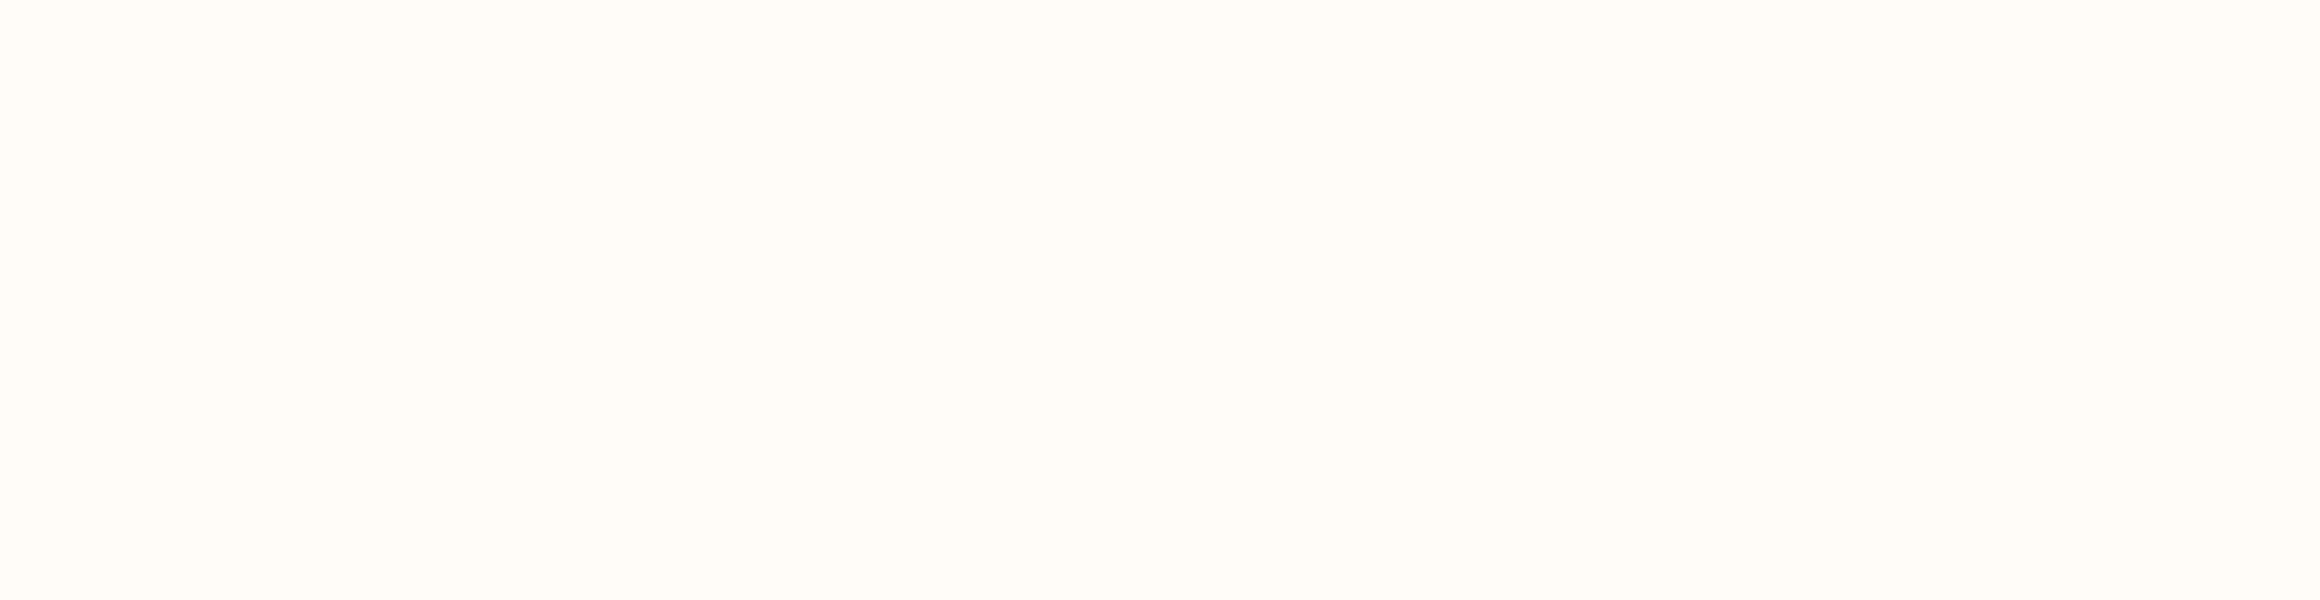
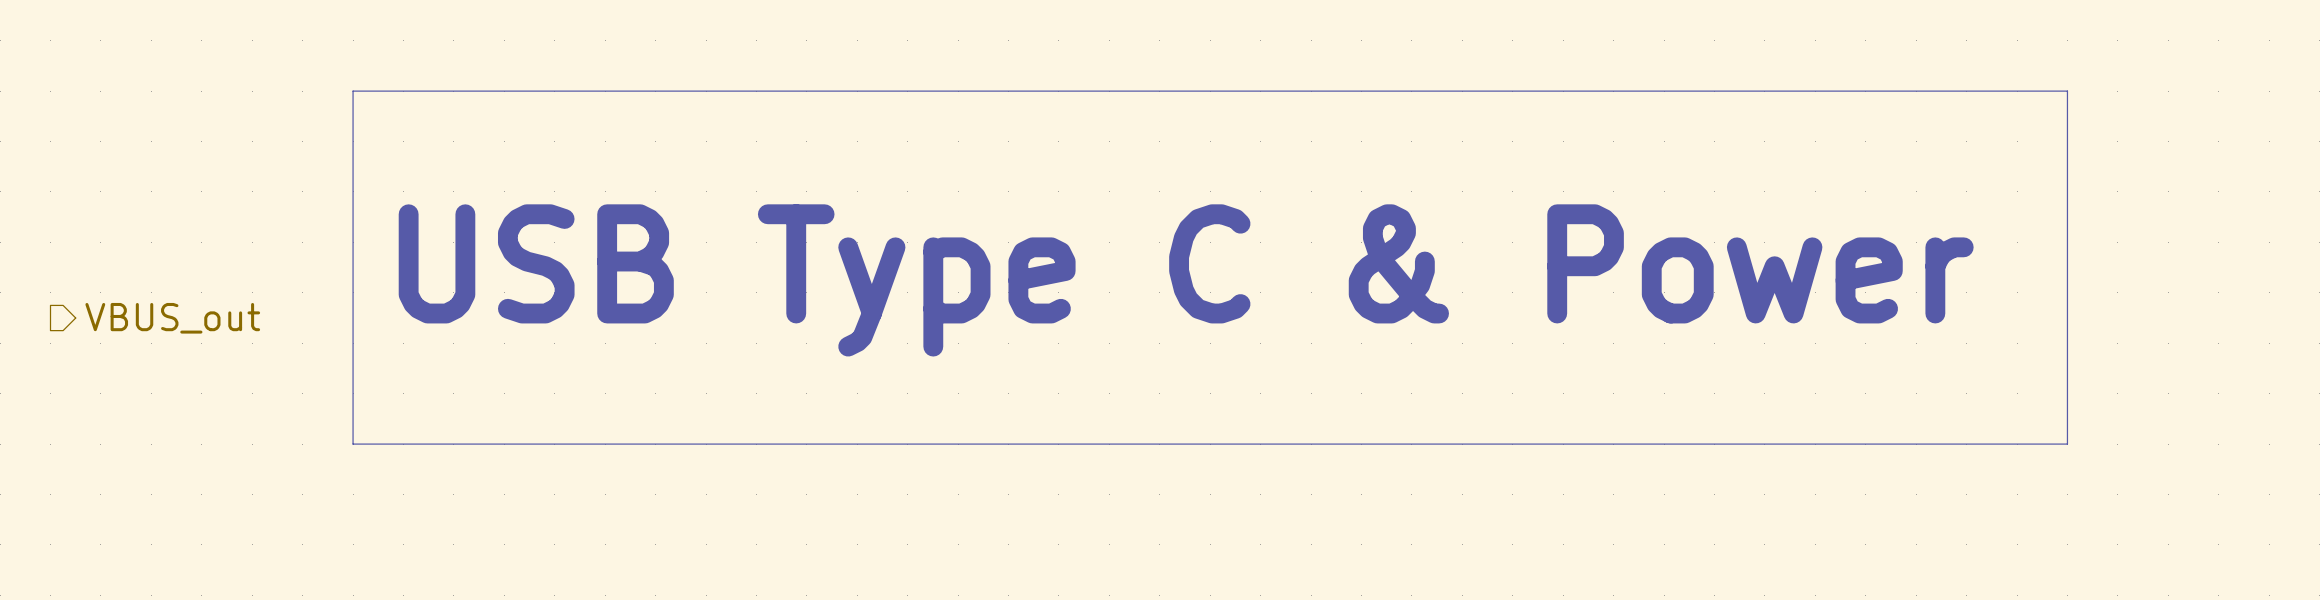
line: none -> (353, 91) (2067, 91) (2067, 444) (353, 444) (353, 91)
text: none -> USB Type C & Power (1186, 280)
hierarchical label: none -> VBUS_out (172, 318)

